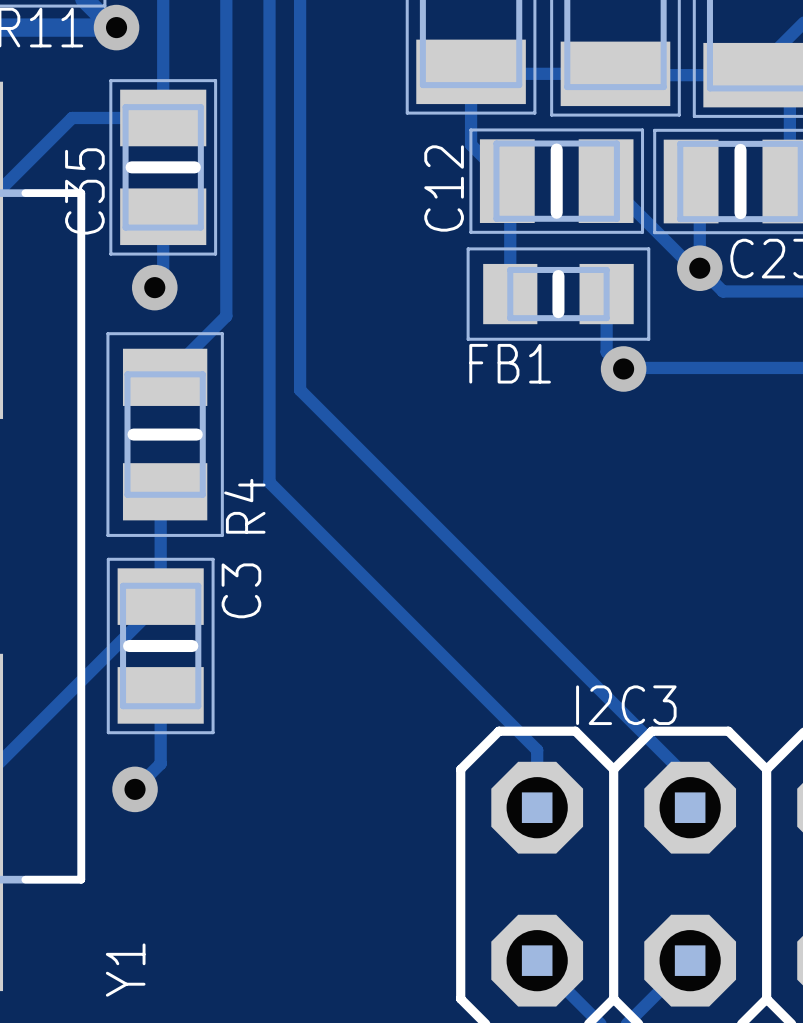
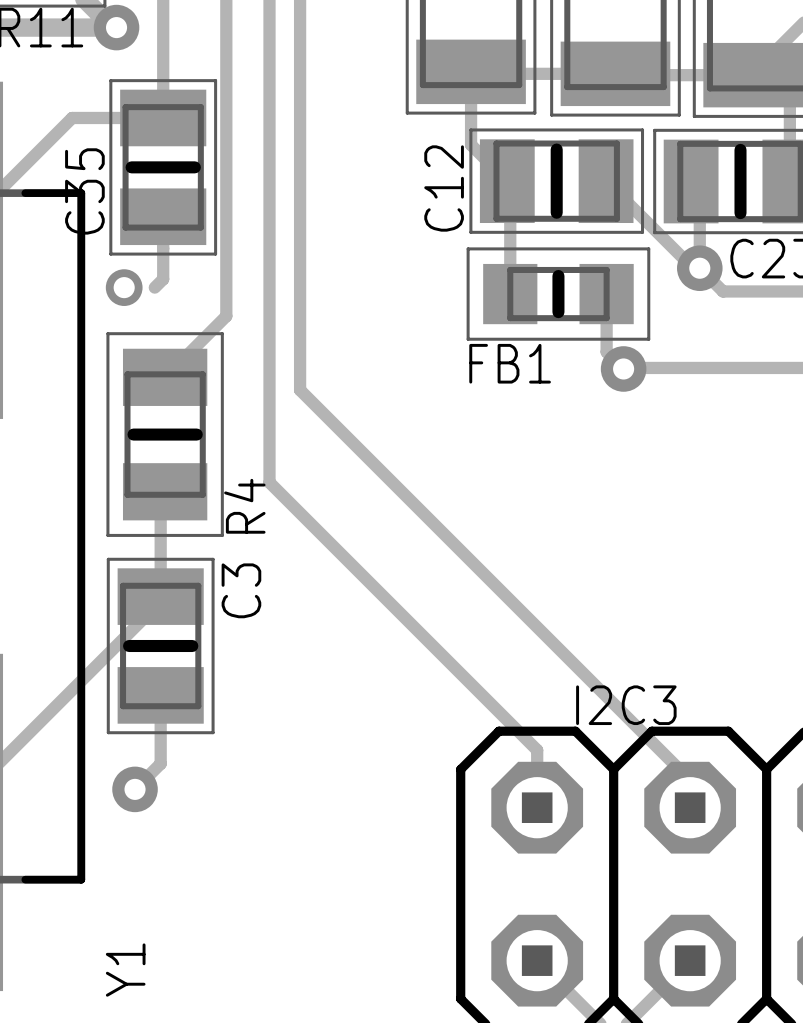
via position: (154, 287) -> (124, 287)

